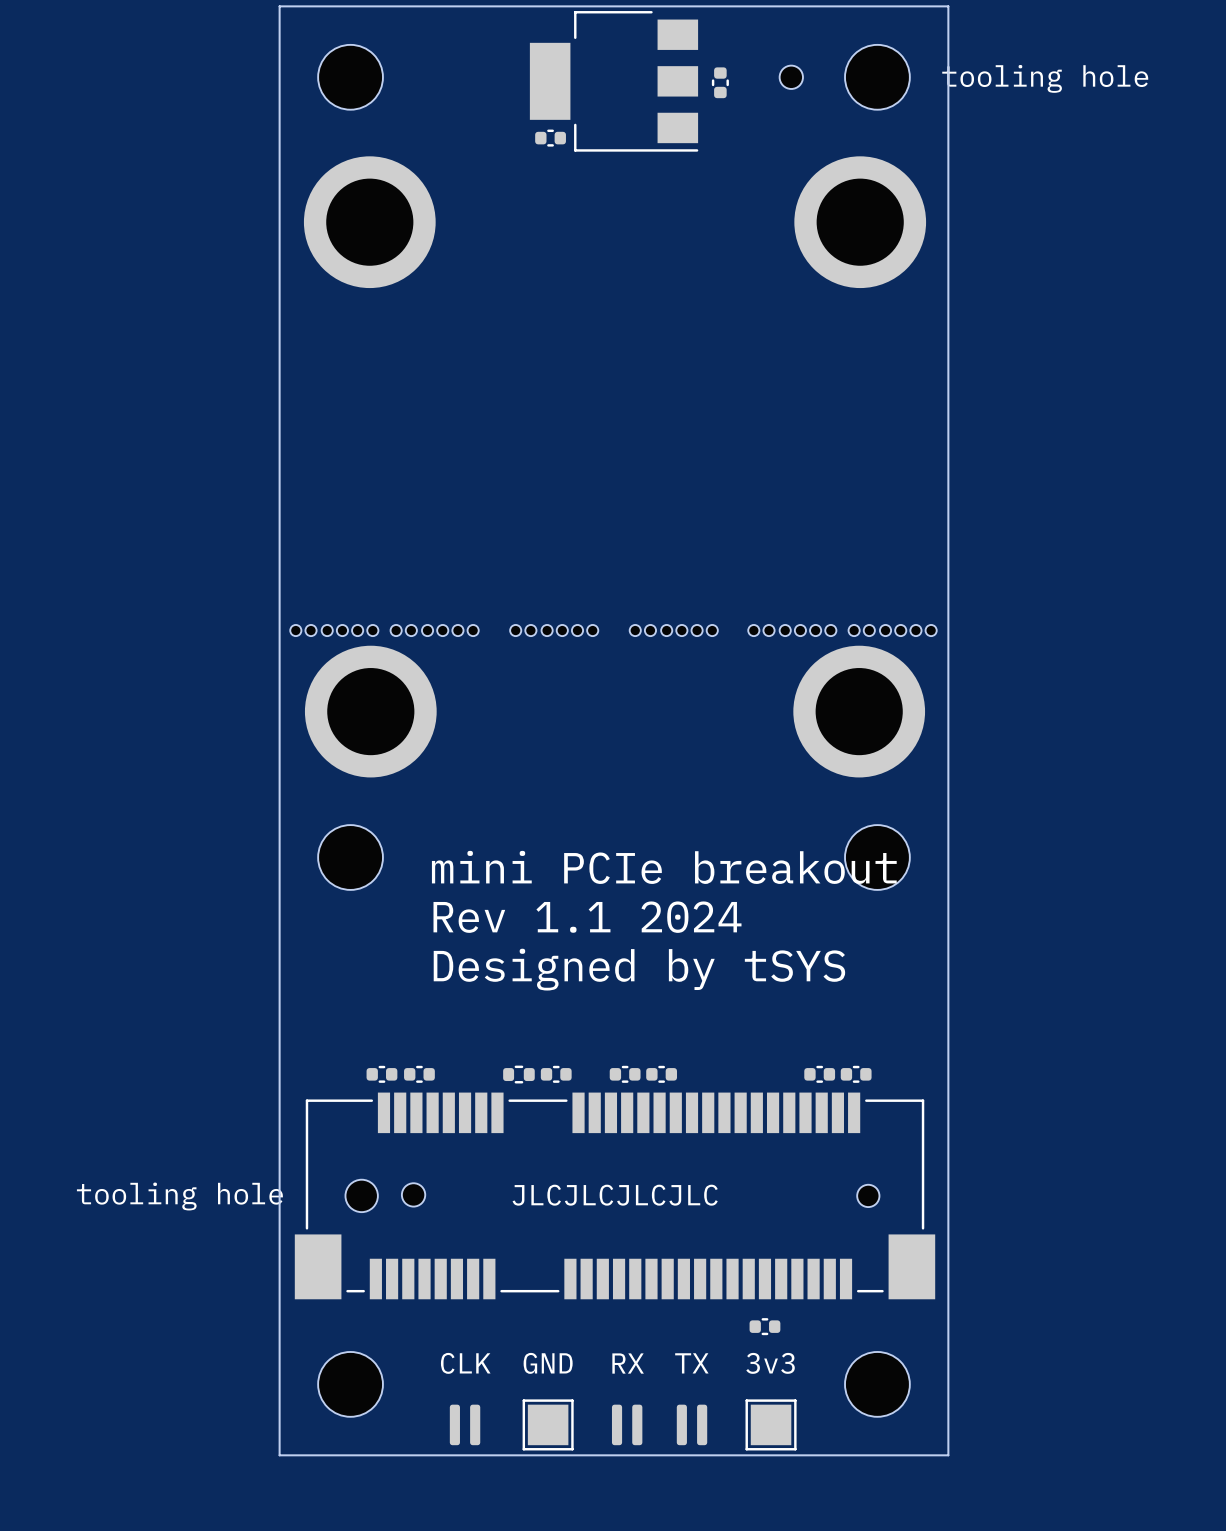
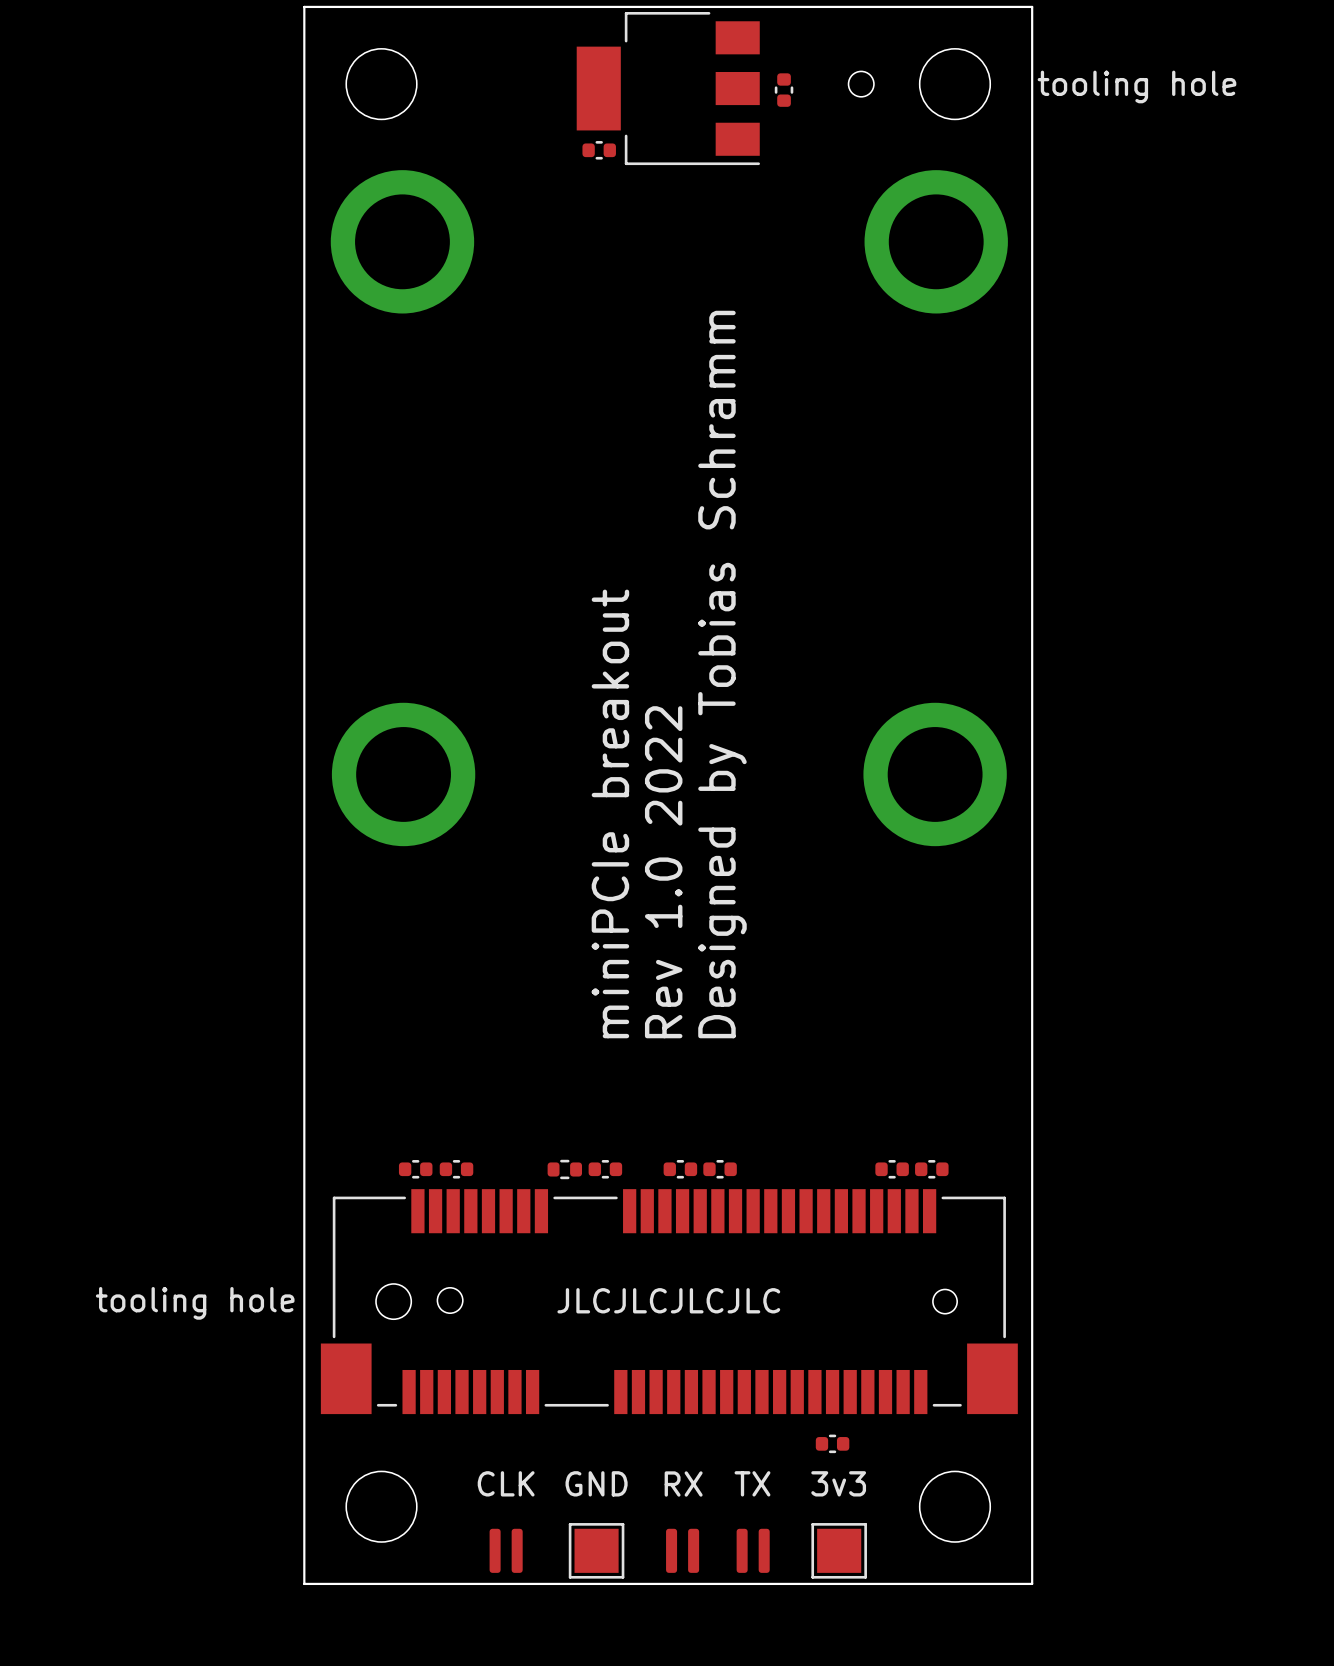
part: (334, 630) -> none
part: (434, 630) -> none
part: (554, 630) -> none
part: (673, 630) -> none
part: (792, 630) -> none
part: (892, 630) -> none
part: (350, 857) -> none
part: (877, 857) -> none
text: mini PCIe breakout (664, 867) -> miniPCIe breakout (610, 813)
text: Rev 1.1 2024 (587, 917) -> Rev 1.0 2022 (663, 872)
text: Designed by tSYS (639, 969) -> Designed by Tobias Schramm (722, 674)

